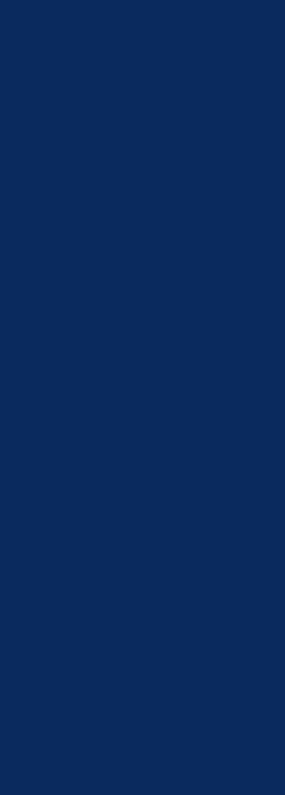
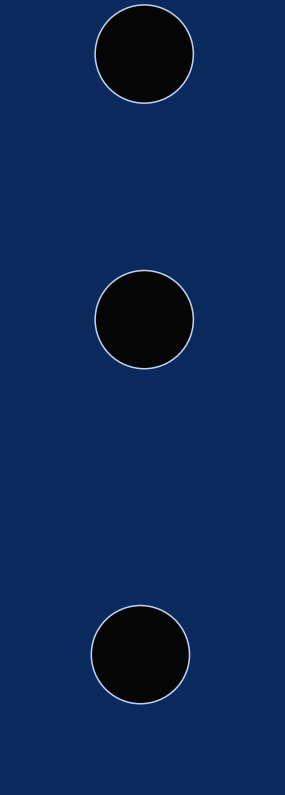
part: none -> (144, 54)
part: none -> (144, 319)
part: none -> (140, 654)

